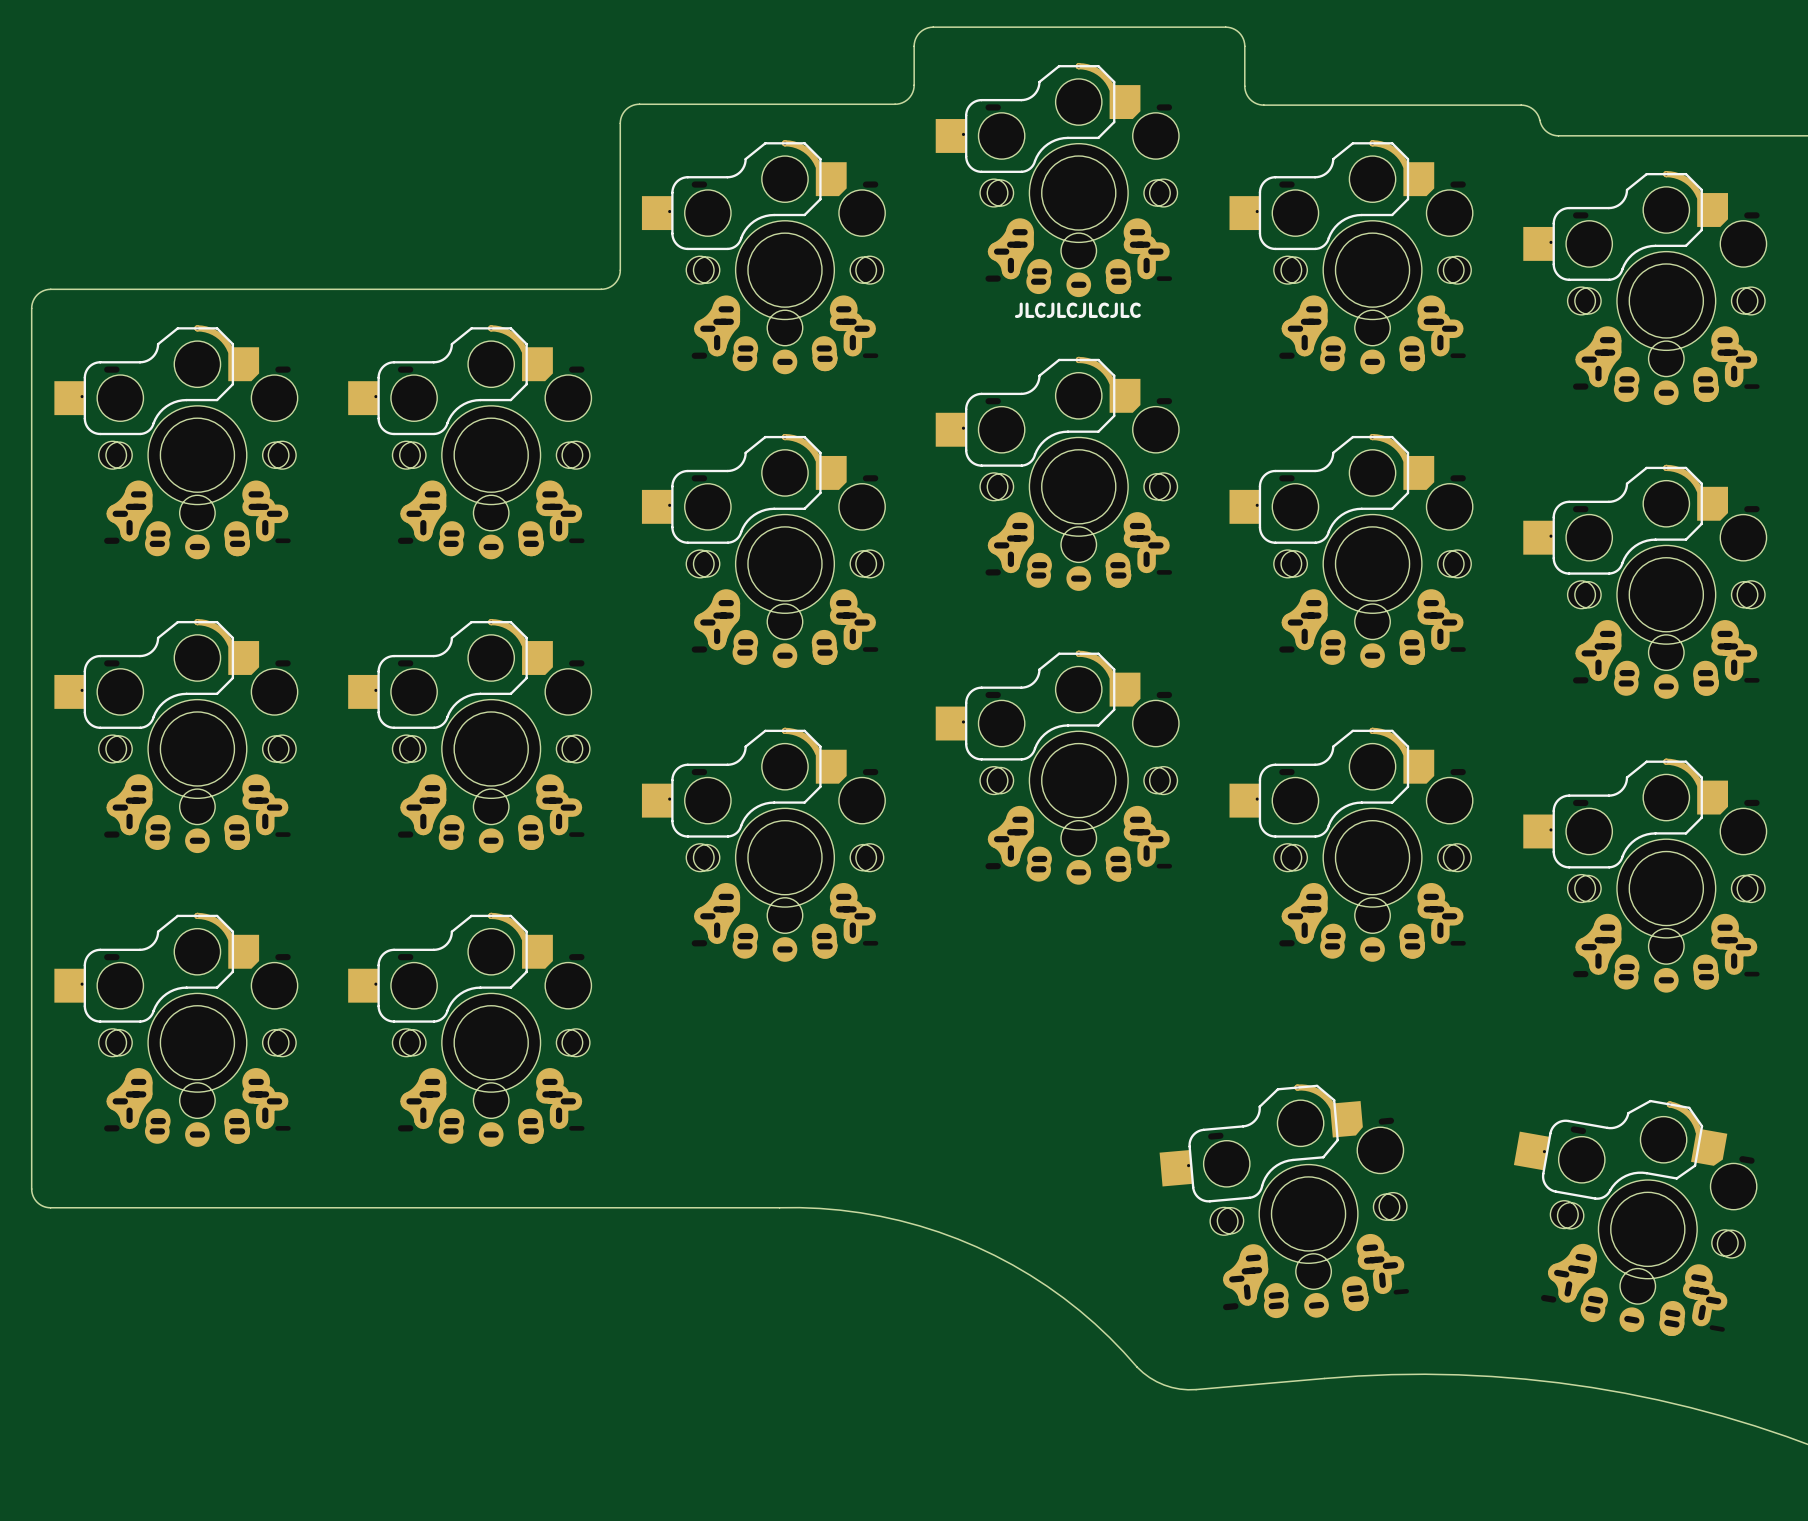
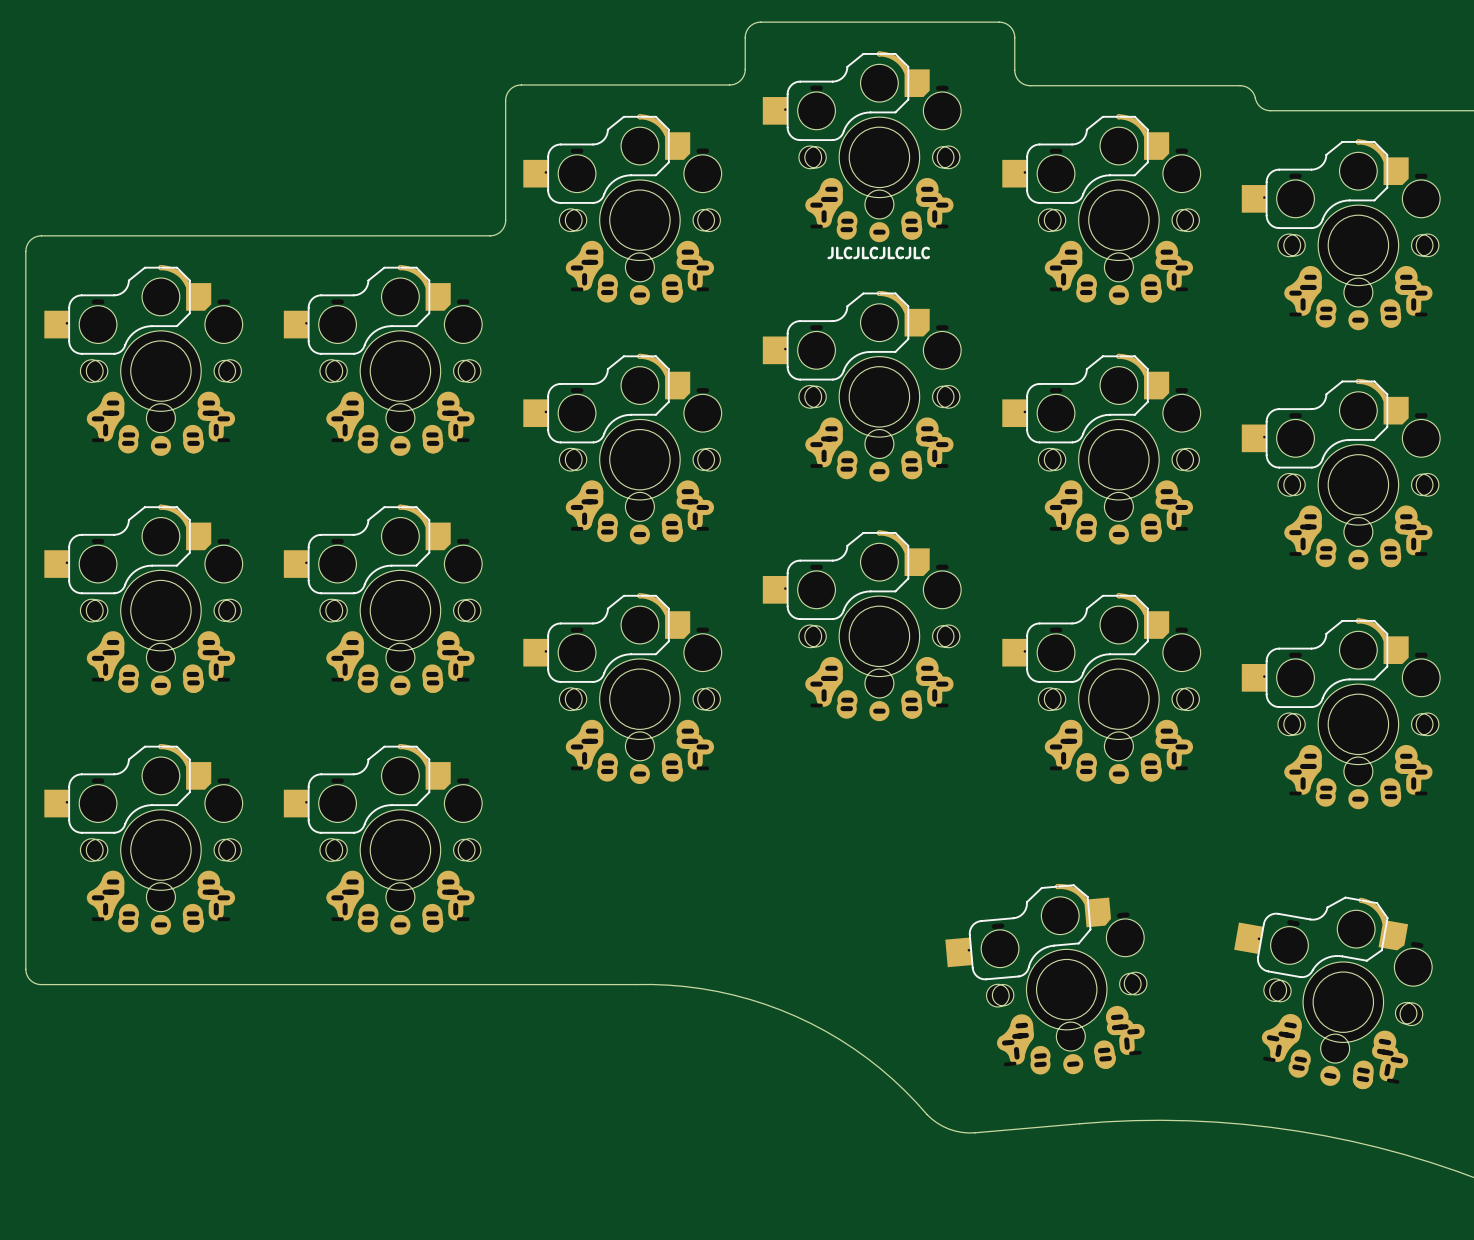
part footprint: [935, 63, 1180, 298] -> [762, 51, 962, 243]
part footprint: [641, 140, 886, 375] -> [523, 114, 722, 306]
part footprint: [1229, 140, 1473, 375] -> [1002, 114, 1201, 306]
part footprint: [1523, 171, 1767, 406] -> [1241, 139, 1441, 331]
part footprint: [54, 325, 298, 560] -> [44, 265, 243, 456]
part footprint: [348, 325, 592, 560] -> [283, 265, 483, 456]
part footprint: [935, 356, 1180, 591] -> [762, 290, 962, 482]
part footprint: [641, 433, 886, 669] -> [523, 353, 722, 545]
part footprint: [1229, 433, 1473, 669] -> [1002, 353, 1201, 545]
part footprint: [1523, 464, 1767, 699] -> [1241, 378, 1441, 570]
part footprint: [54, 619, 298, 854] -> [44, 504, 243, 696]
part footprint: [348, 619, 592, 854] -> [283, 504, 483, 696]
part footprint: [935, 650, 1180, 885] -> [762, 530, 962, 722]
part footprint: [641, 727, 886, 962] -> [523, 593, 722, 785]
part footprint: [1229, 727, 1473, 962] -> [1002, 593, 1201, 785]
part footprint: [1523, 758, 1767, 993] -> [1241, 618, 1441, 810]
part footprint: [54, 912, 298, 1147] -> [44, 744, 243, 935]
part footprint: [348, 912, 592, 1147] -> [283, 744, 483, 935]
part footprint: [1159, 1084, 1409, 1319] -> [945, 883, 1147, 1075]
part footprint: [1513, 1099, 1757, 1336] -> [1234, 896, 1433, 1090]

